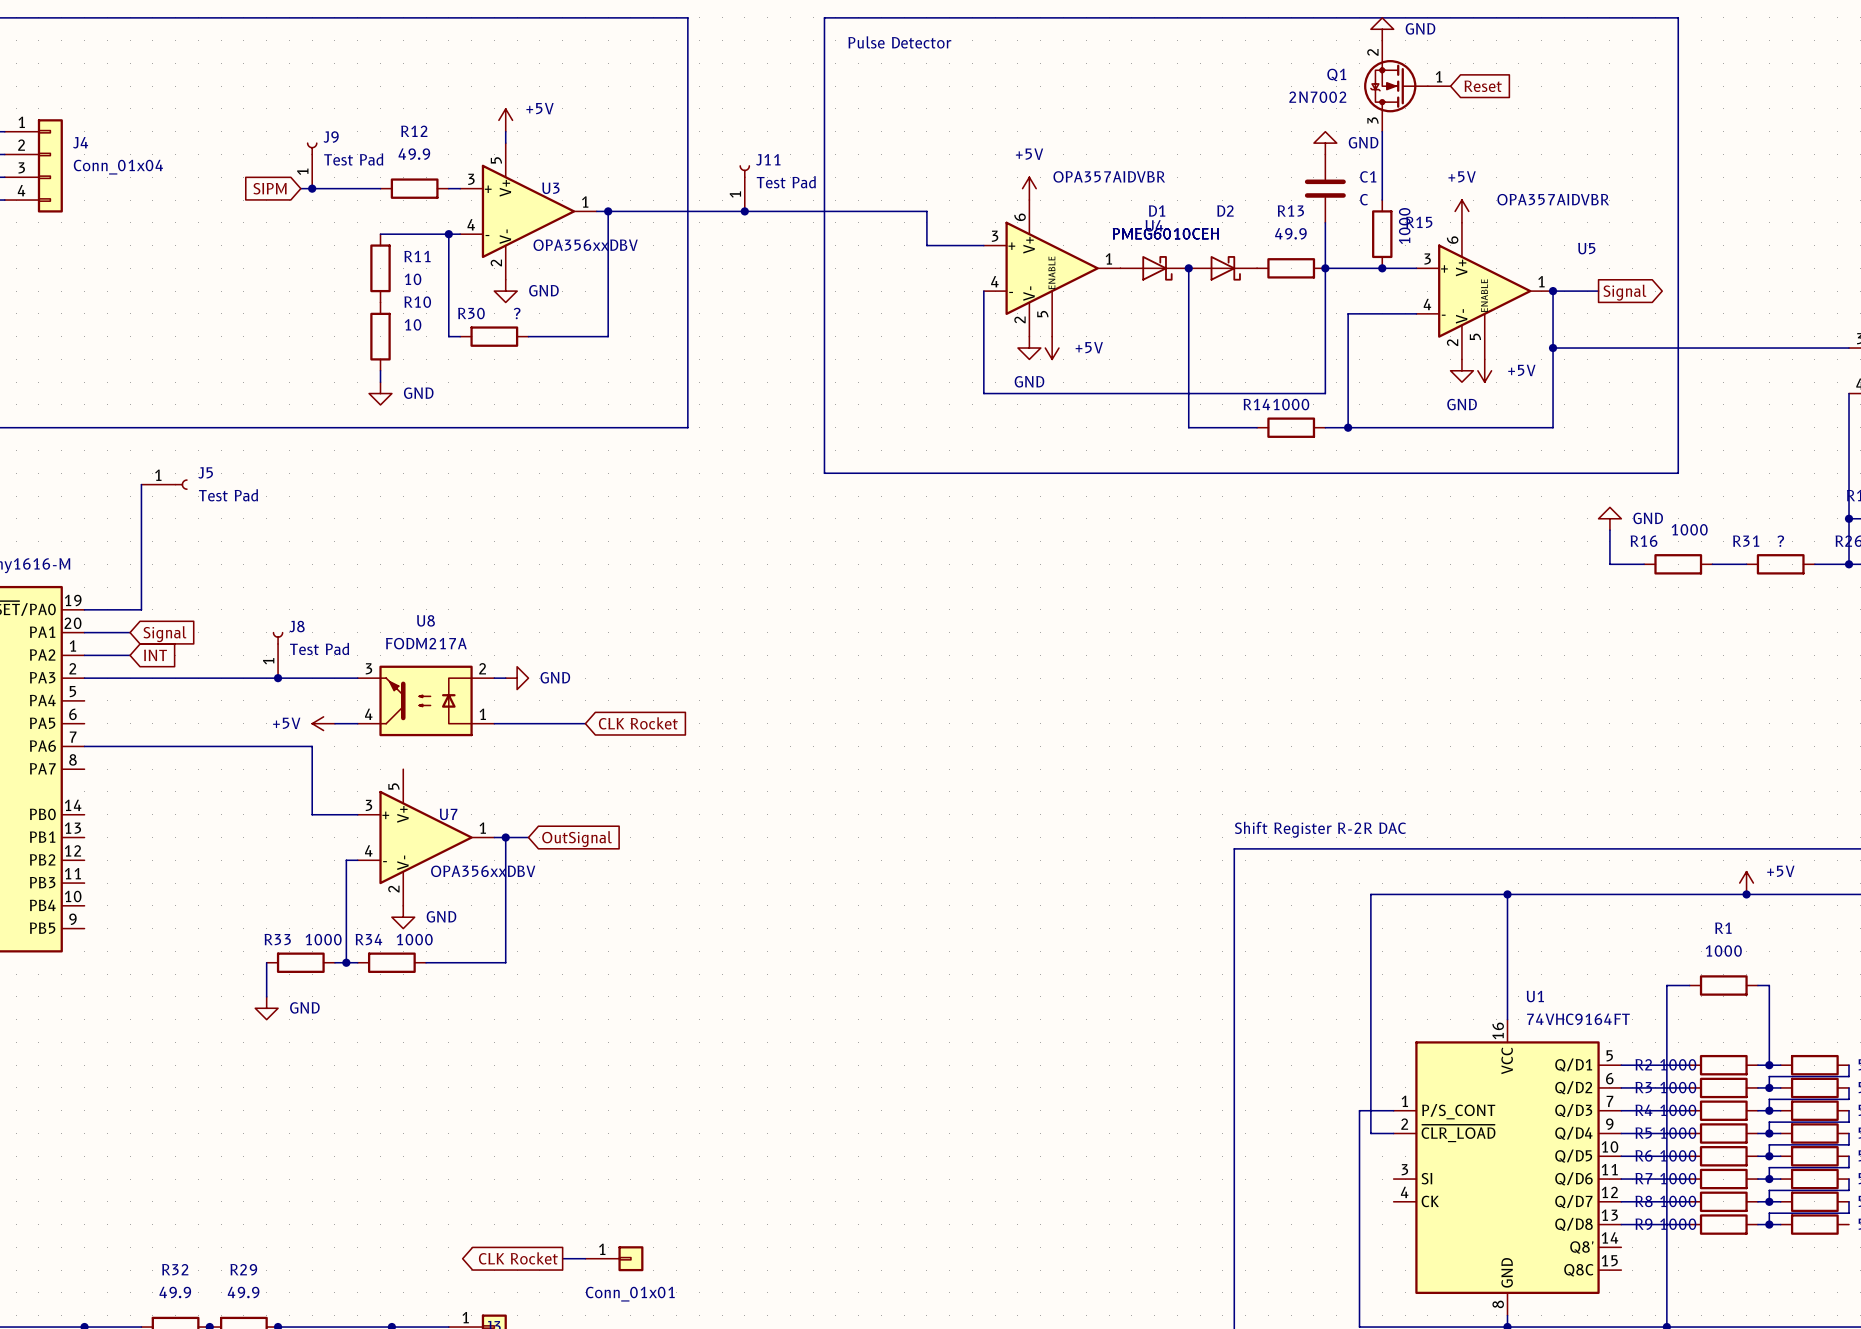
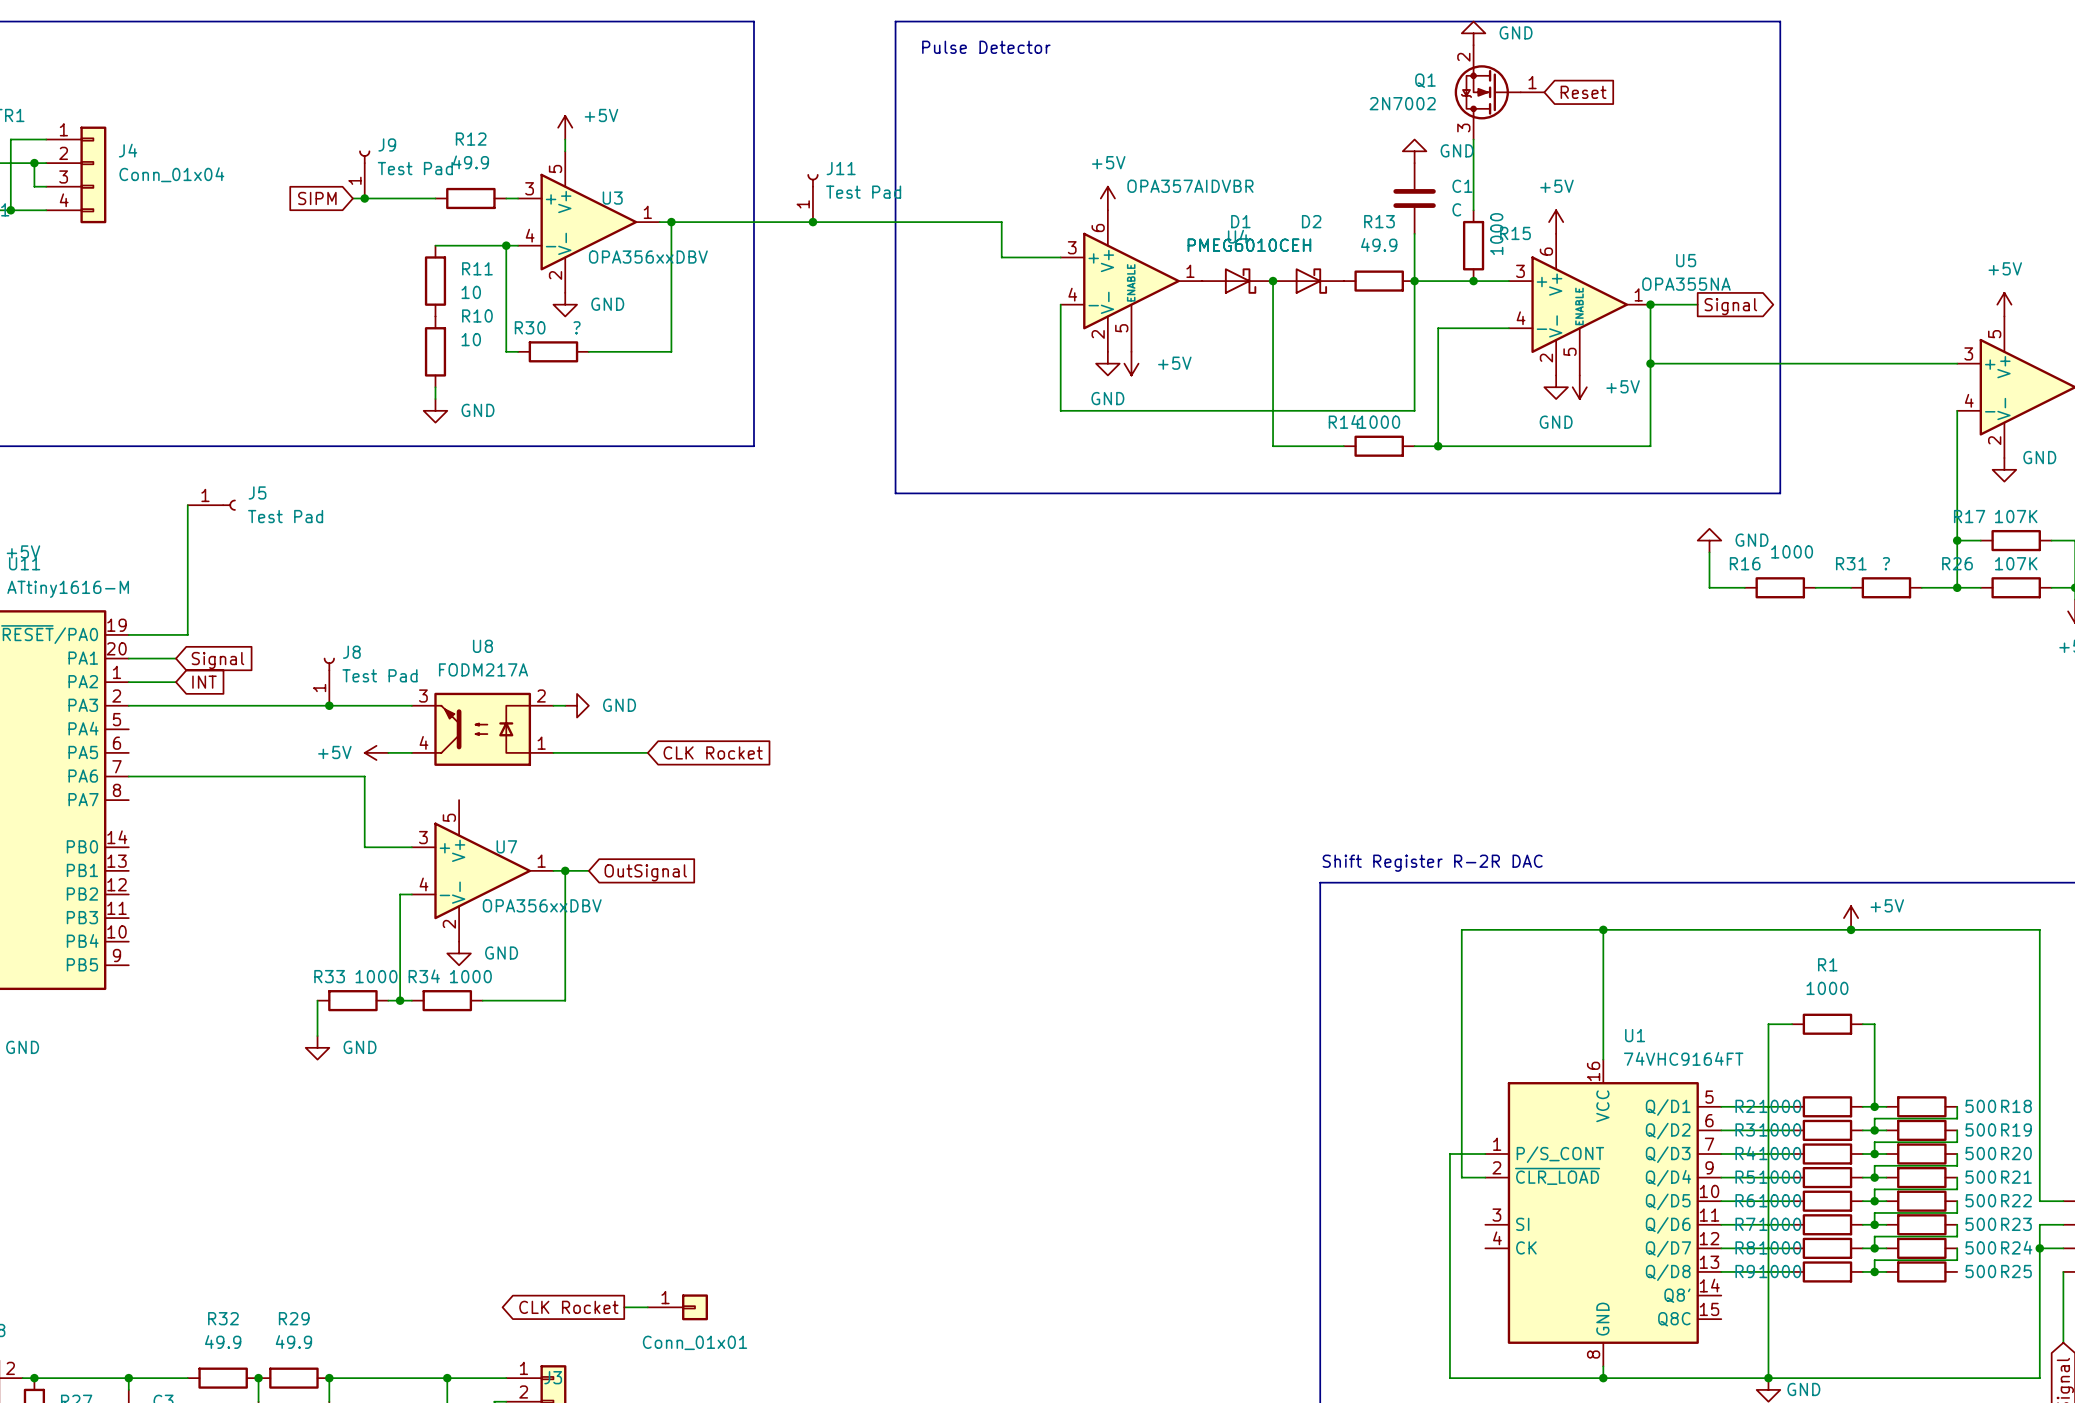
U5 value: OPA357AIDVBR (1553, 199) -> OPA355NA (1686, 284)

